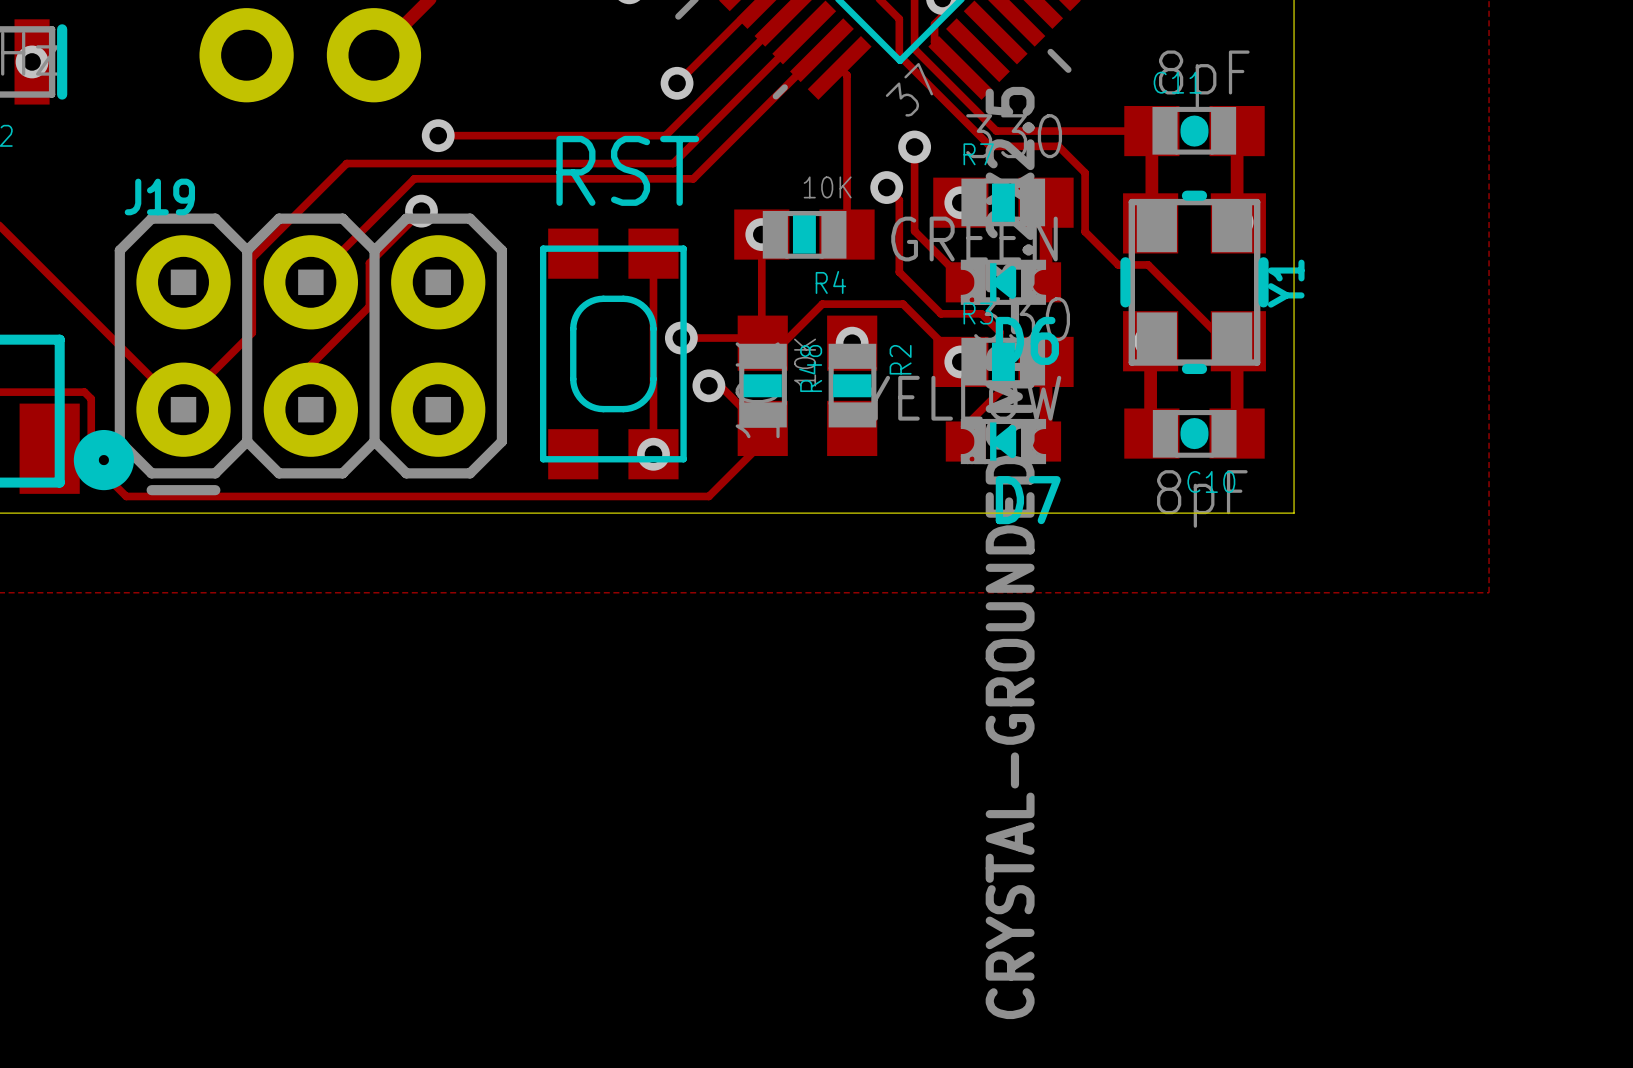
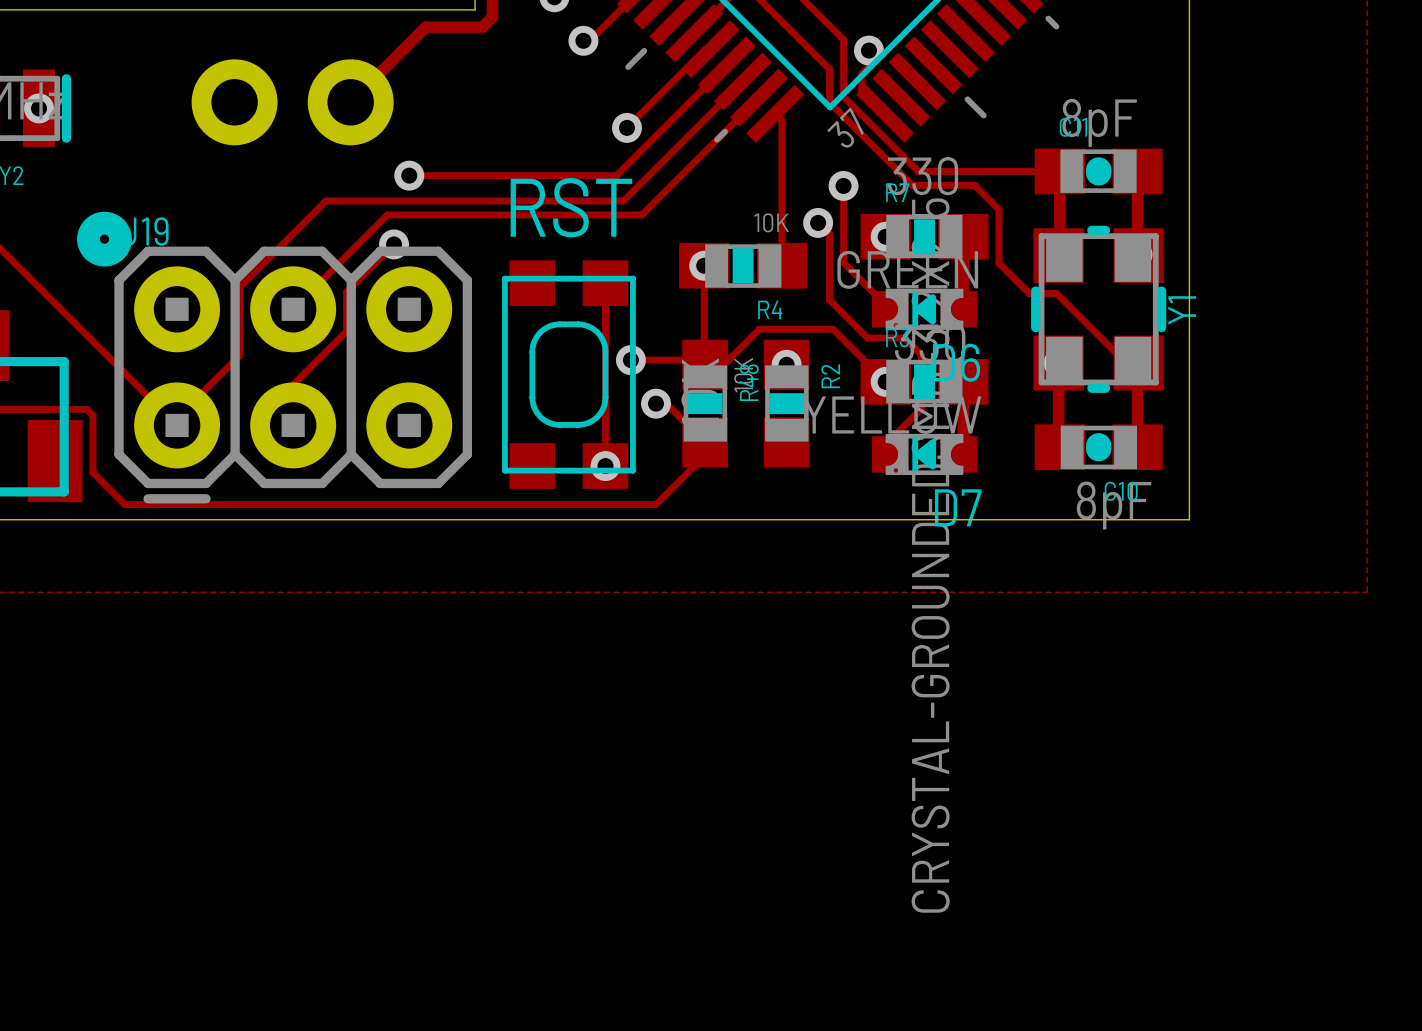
drawing position: (103, 460) -> (104, 239)

